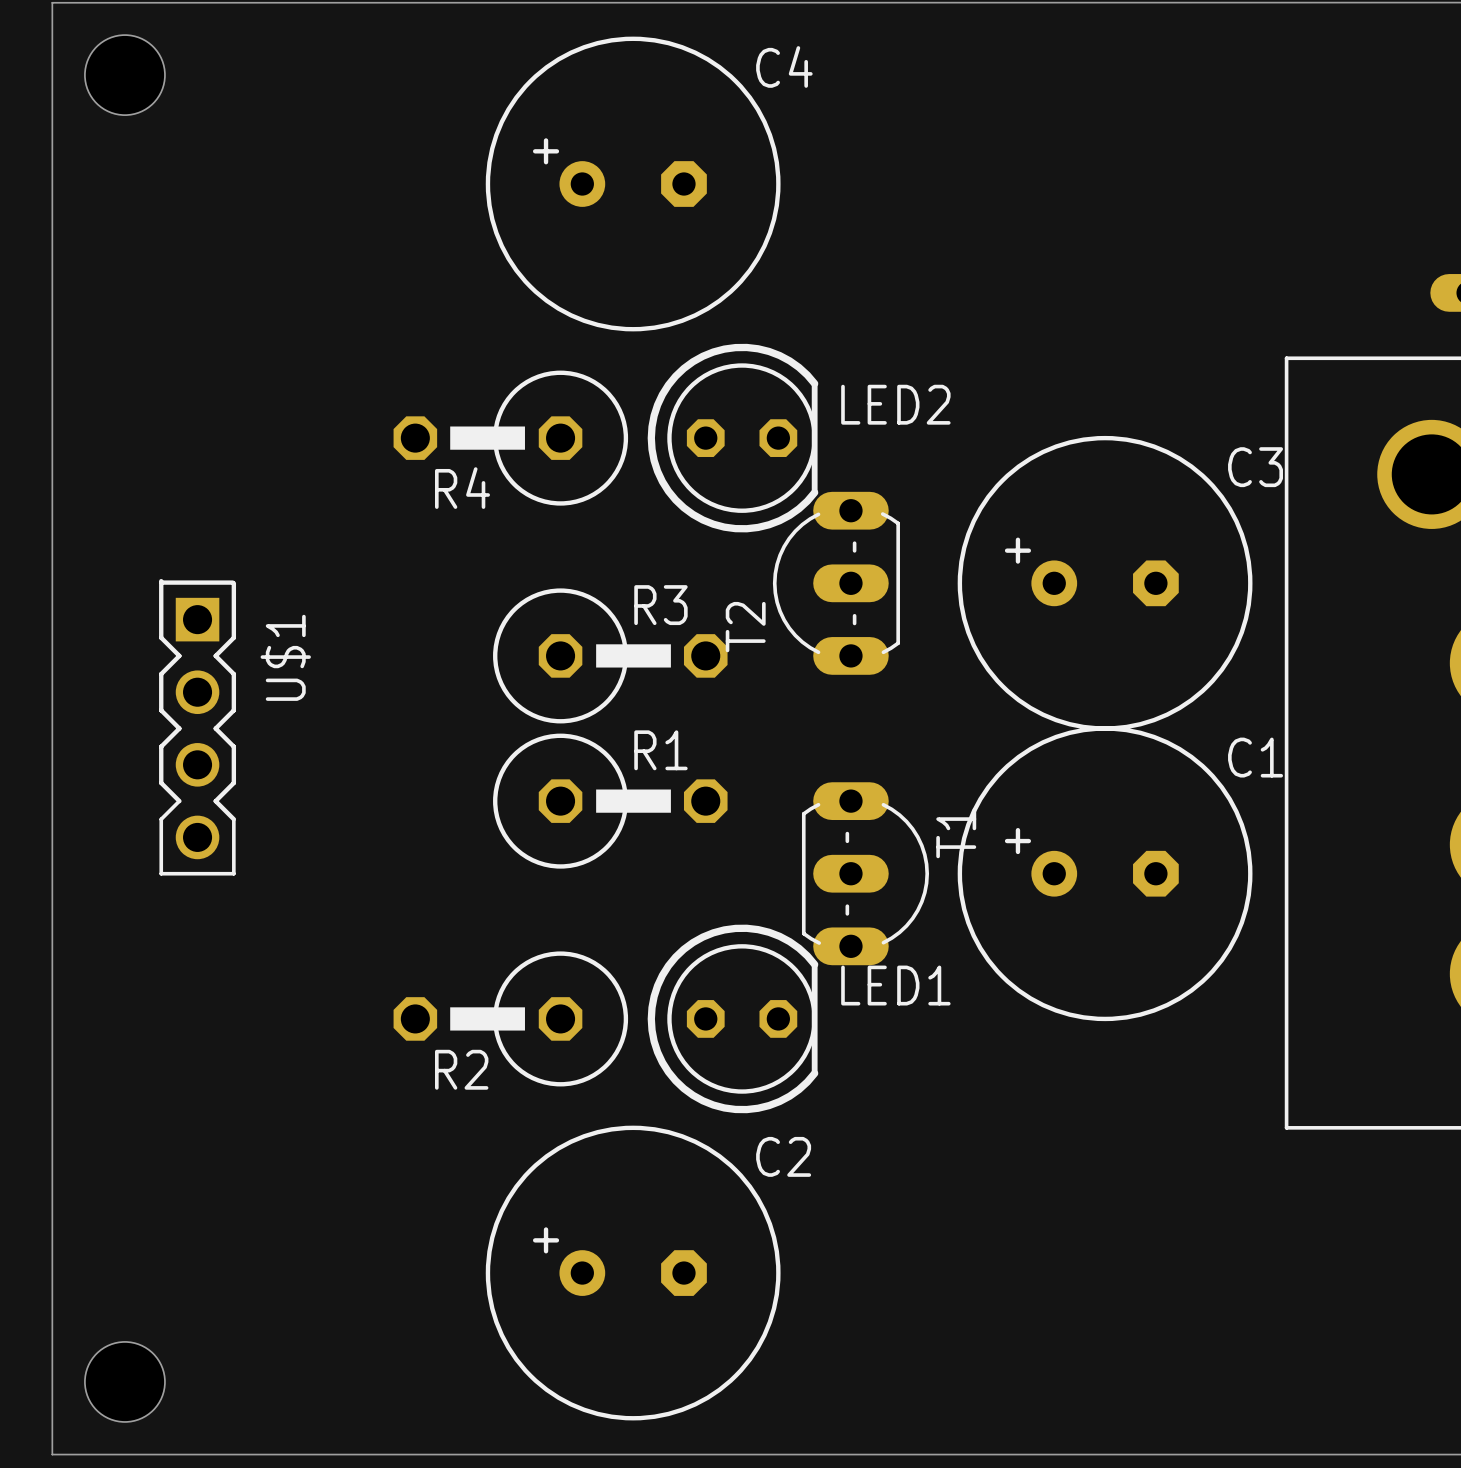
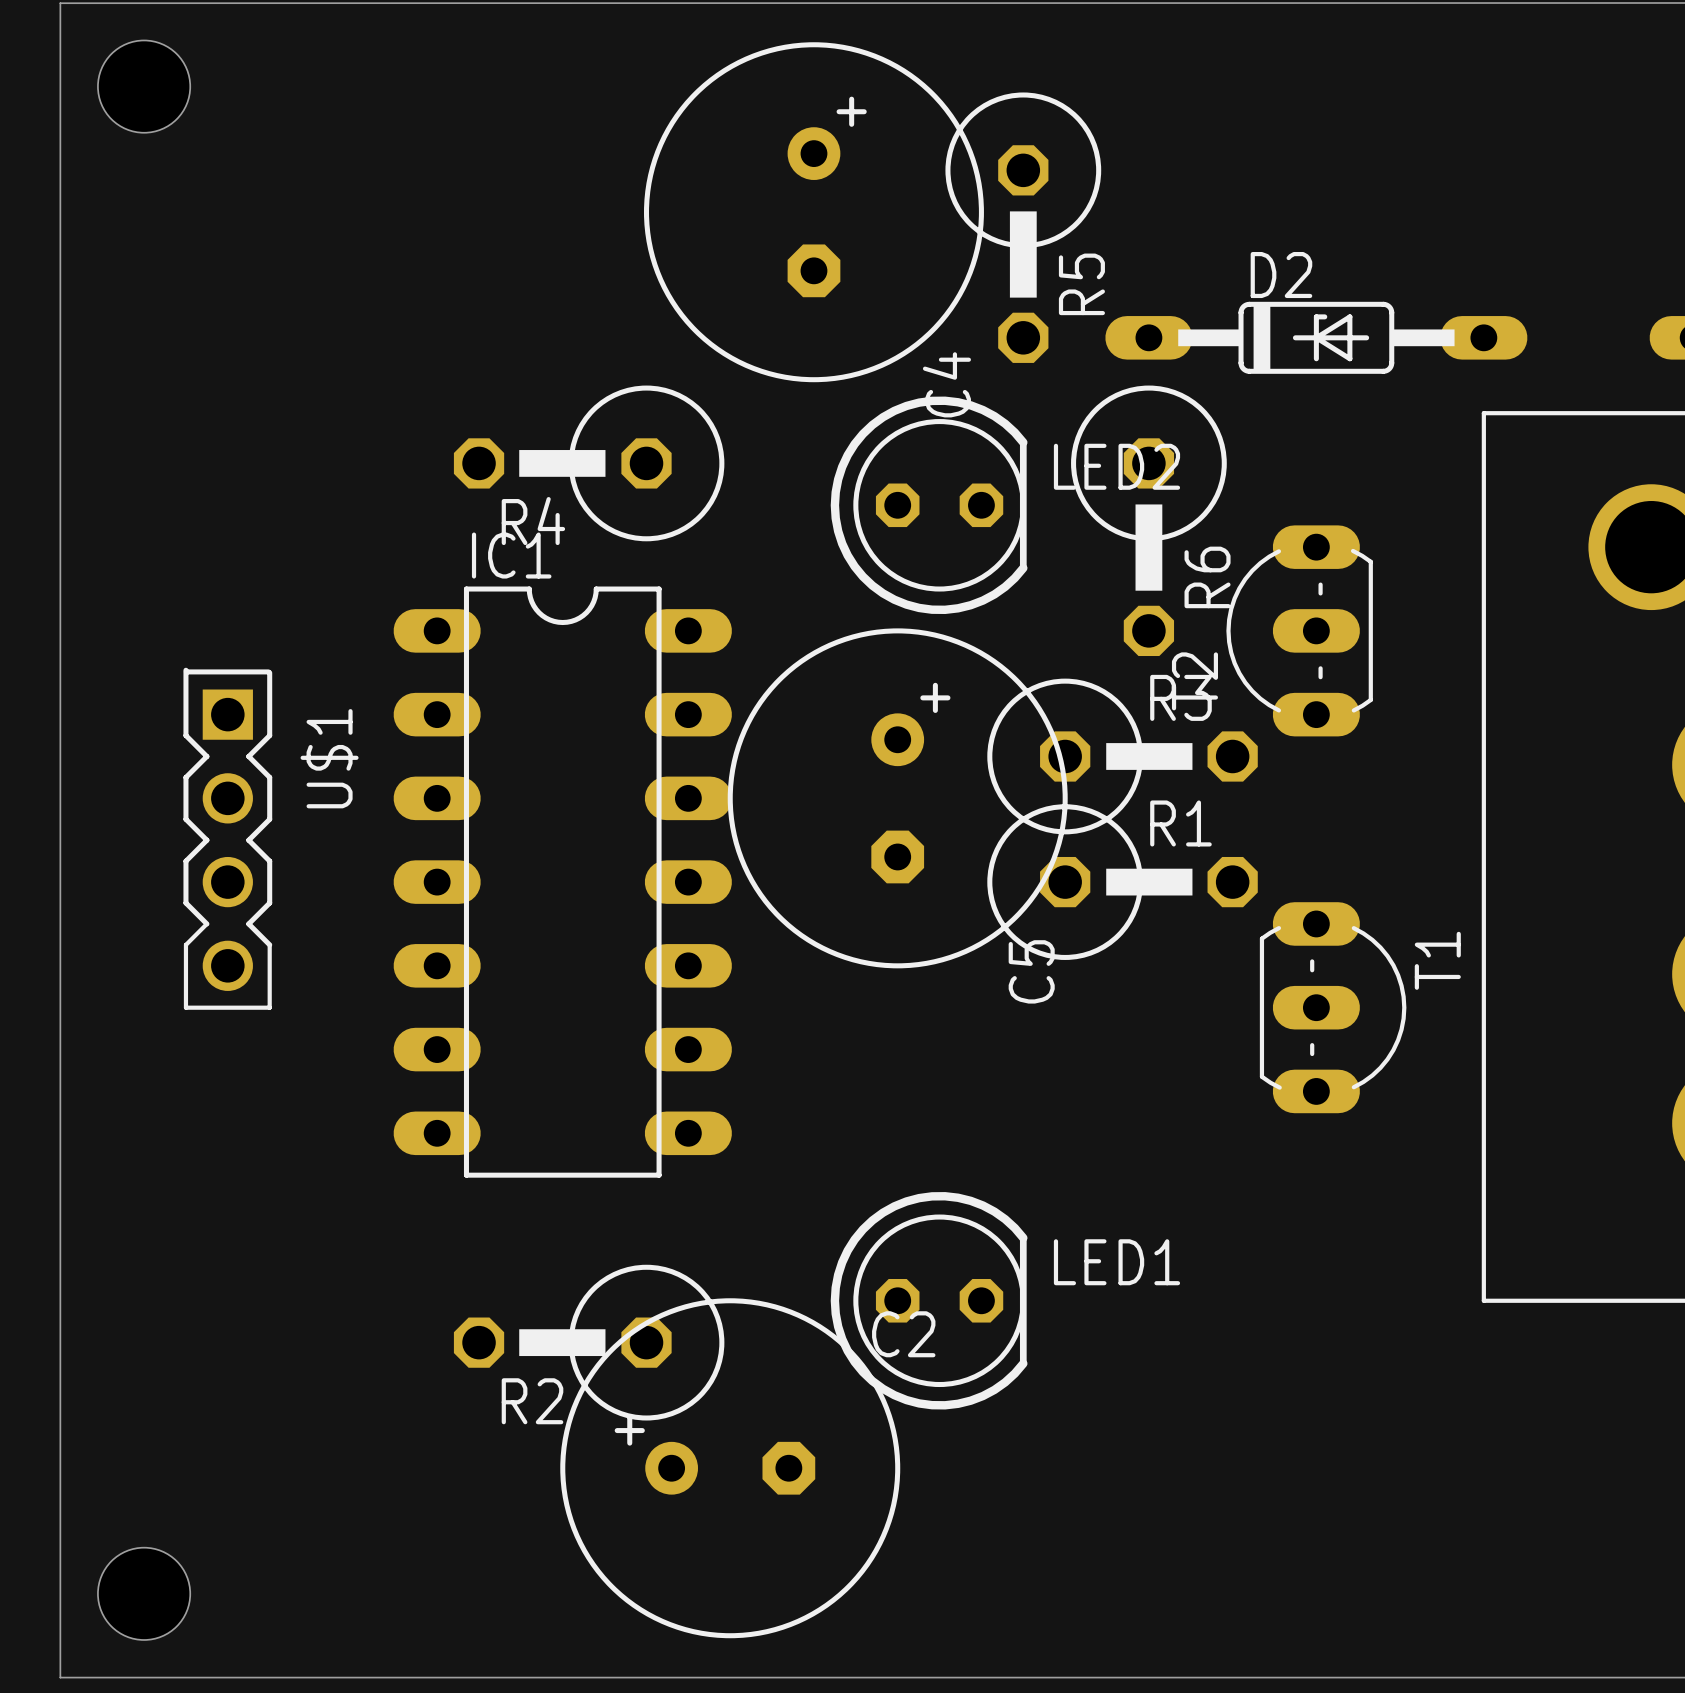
C4 rotation: 0° (633, 184) -> 90° clockwise (813, 212)
R5: none -> (1023, 227)
D2: none -> (1316, 337)
R4 position: (510, 438) -> (589, 463)
LED2 position: (732, 438) -> (929, 505)
R6: none -> (1148, 520)
T2 position: (836, 583) -> (1299, 630)
C3: (1105, 583) -> none
R3 position: (610, 655) -> (1122, 756)
C5: none -> (897, 798)
IC1: none -> (562, 882)
R1 position: (610, 801) -> (1122, 882)
T1 position: (865, 873) -> (1333, 1007)
C1: (1105, 873) -> none
R2 position: (510, 1018) -> (589, 1342)
LED1 position: (732, 1018) -> (929, 1300)

